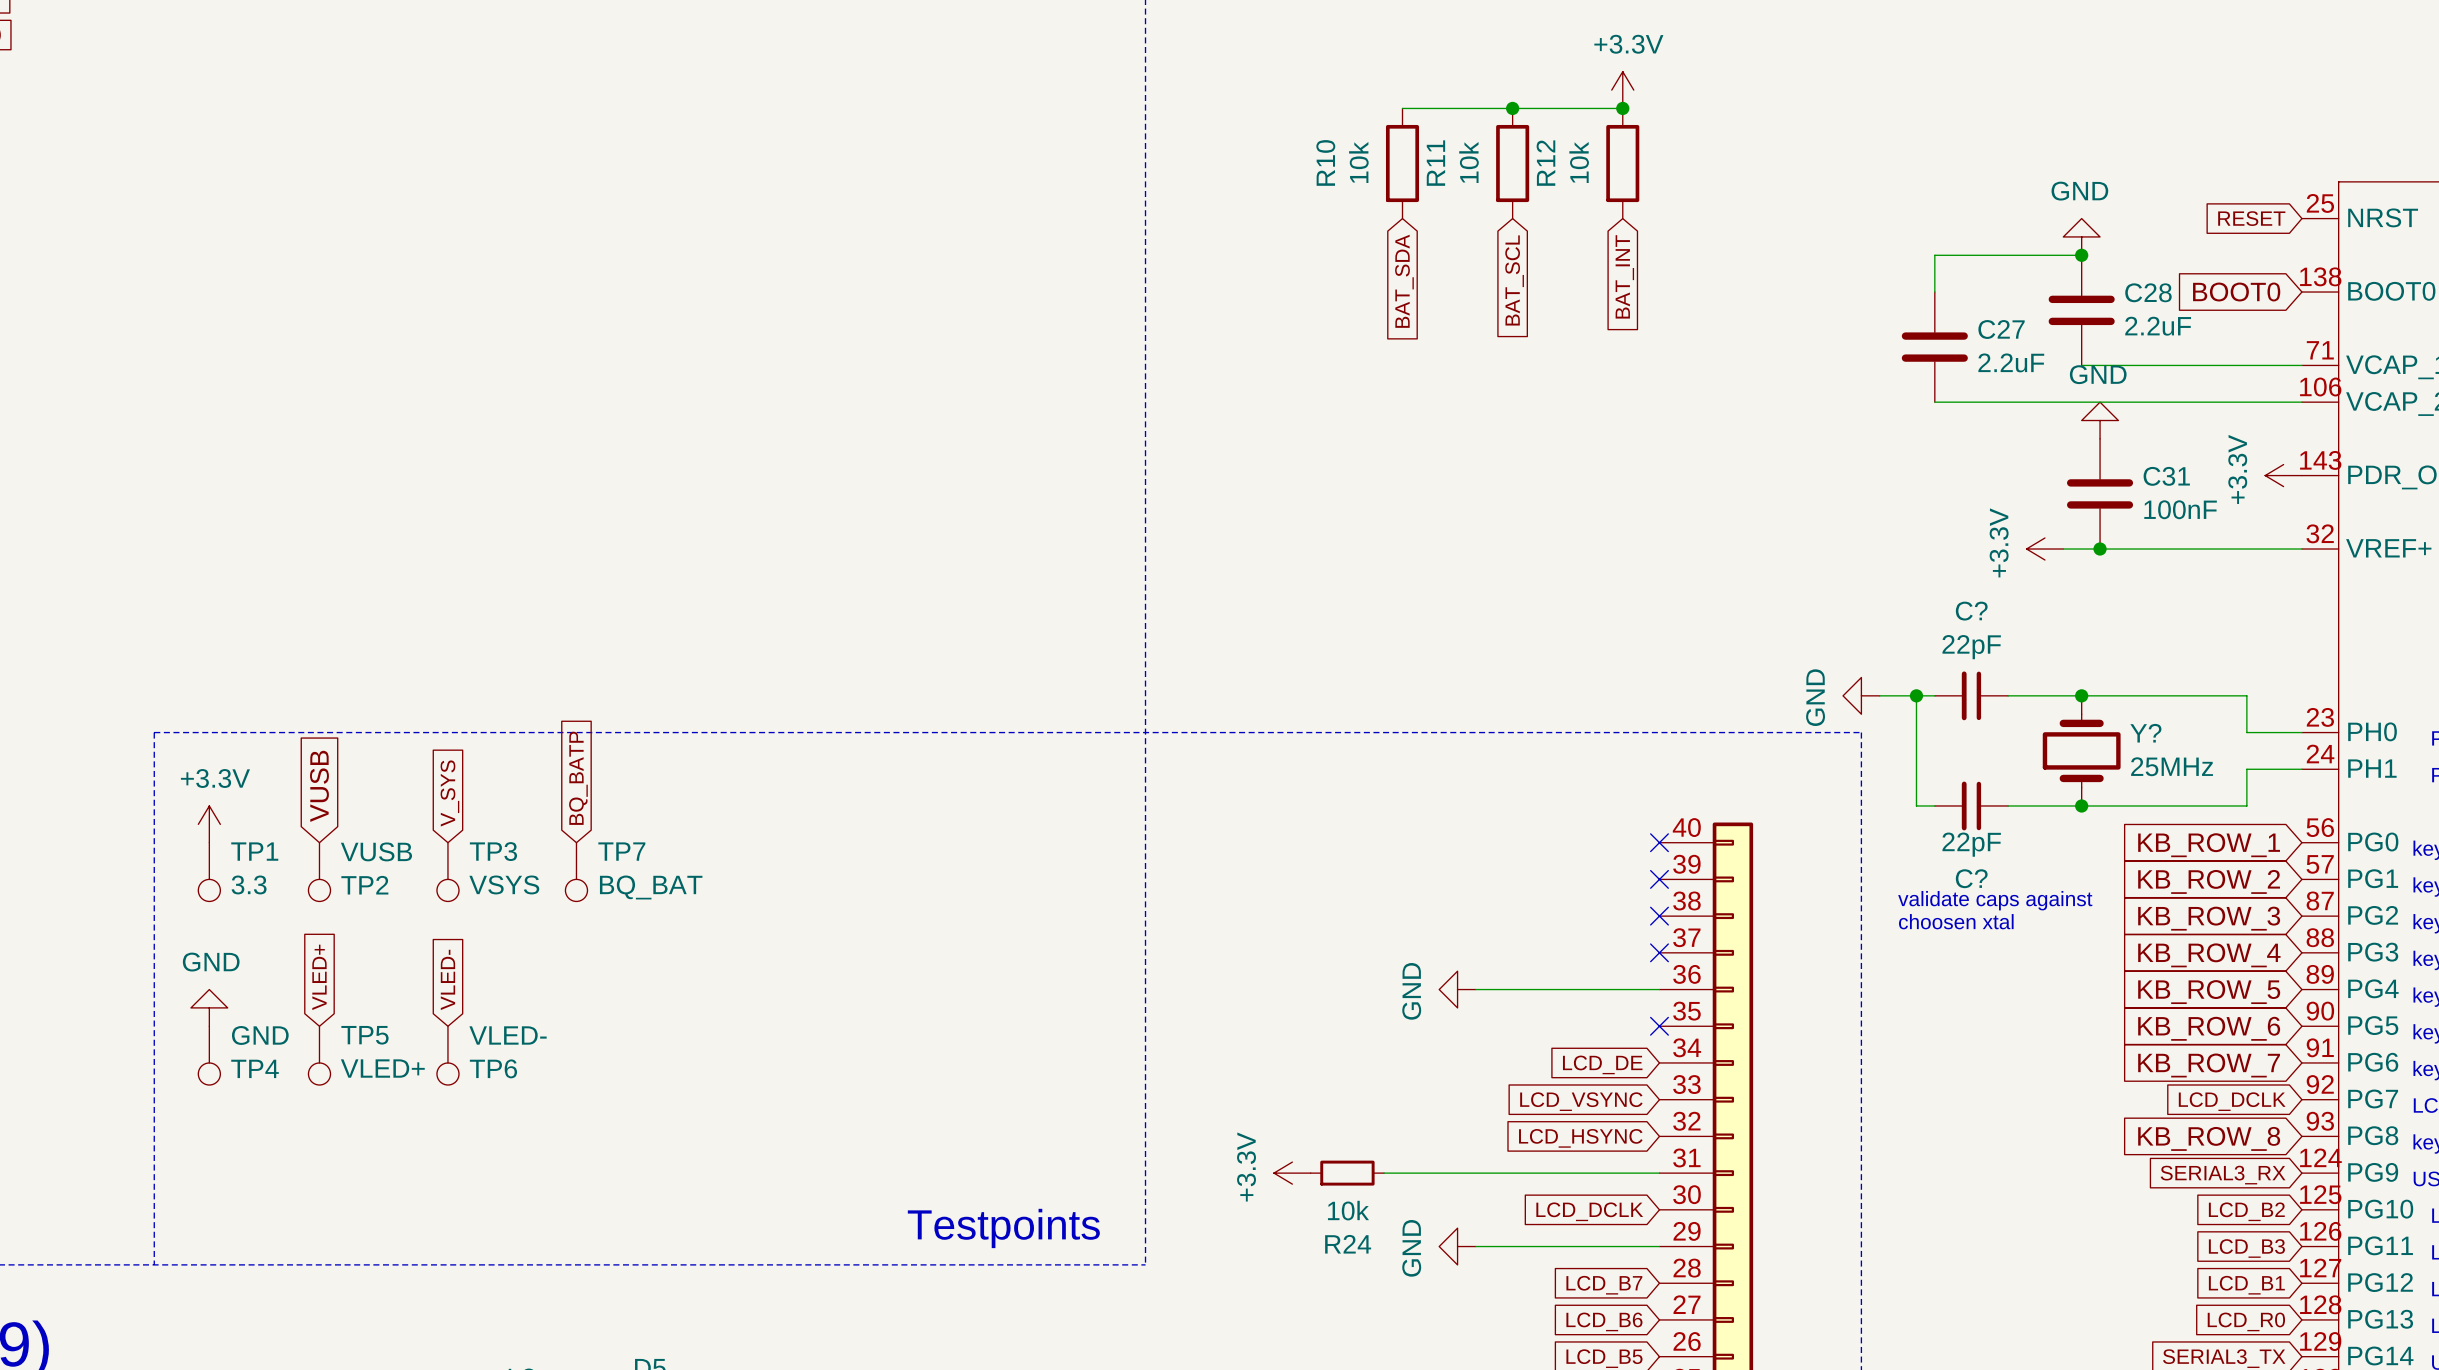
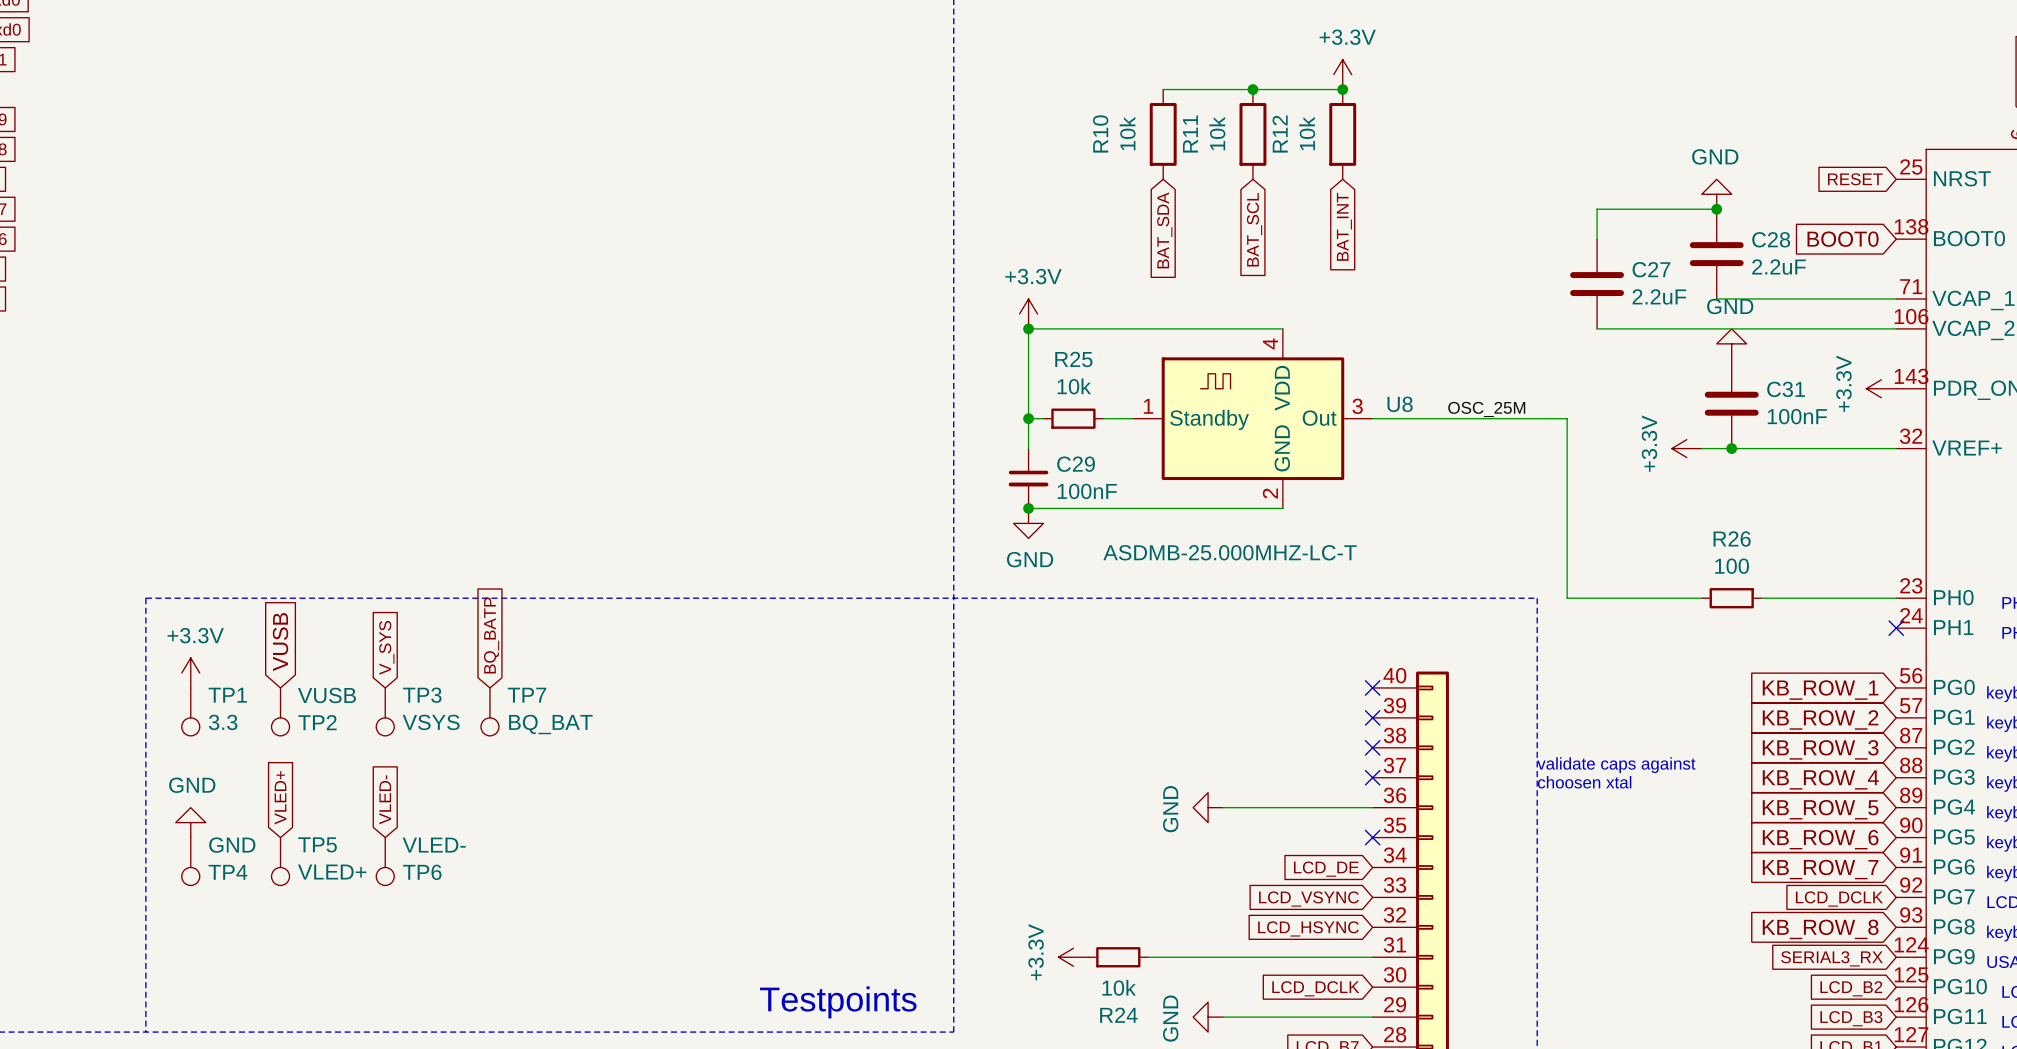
power symbol: none -> +3.3V (1028, 313)
junction: none -> (1028, 328)
wire: none -> (1282, 328) (1028, 328) (1028, 448)
label: none -> OSC_25M (1486, 409)
wire: none -> (1028, 418) (1043, 418)
junction: none -> (1028, 418)
R25: none -> 10k (1073, 418)
wire: none -> (1103, 418) (1133, 418)
U8: none -> ASDMB-25.000MHZ-LC-T (1252, 418)
wire: none -> (1372, 418) (1567, 418) (1567, 598) (1701, 598)
C29: none -> 100nF (1028, 478)
wire: none -> (1028, 508) (1282, 508)
junction: none -> (1028, 508)
power symbol: none -> GND (1028, 523)
power symbol: GND (1861, 695) -> none
wire: (1879, 695) (1934, 695) -> none
wire: (1916, 695) (1916, 805) (1934, 805) -> none
junction: (1916, 695) -> none
C?: 22pF (1971, 695) -> none
wire: (2008, 695) (2246, 695) (2246, 732) -> (1761, 598) (1851, 598)
junction: (2081, 695) -> none
R26: none -> 100 (1731, 598)
Y?: 25MHz (2081, 750) -> none
wire: (2301, 769) (2246, 769) (2246, 805) (2008, 805) -> none
no-connect mark: none -> (1896, 628)
C?: 22pF (1971, 805) -> none
junction: (2081, 805) -> none
text position: validate caps against (1995, 900) -> validate caps against (1616, 765)
text position: choosen xtal (1956, 921) -> choosen xtal (1584, 782)

